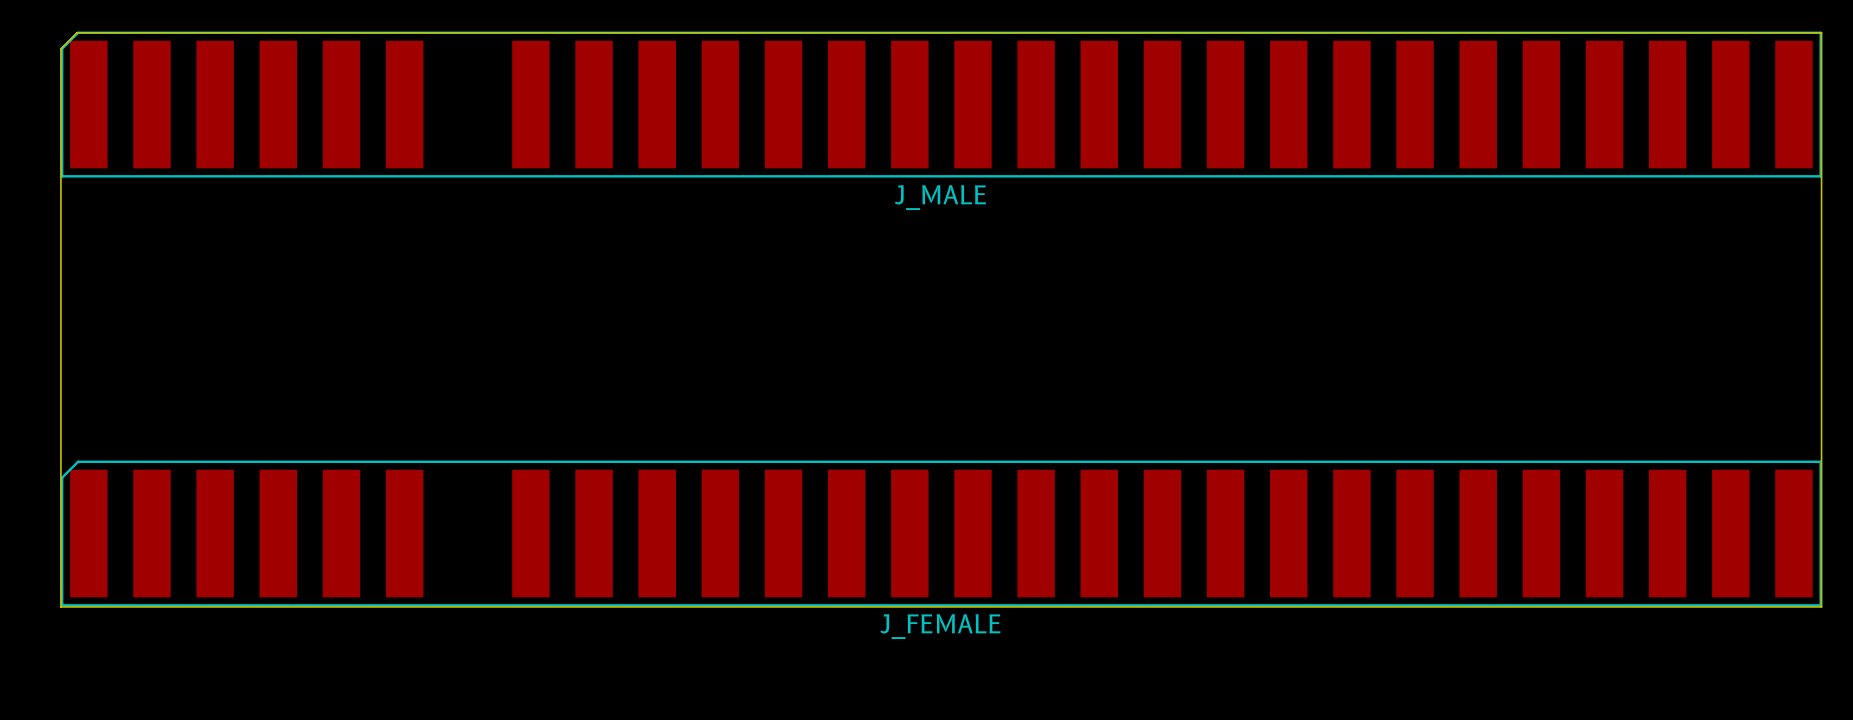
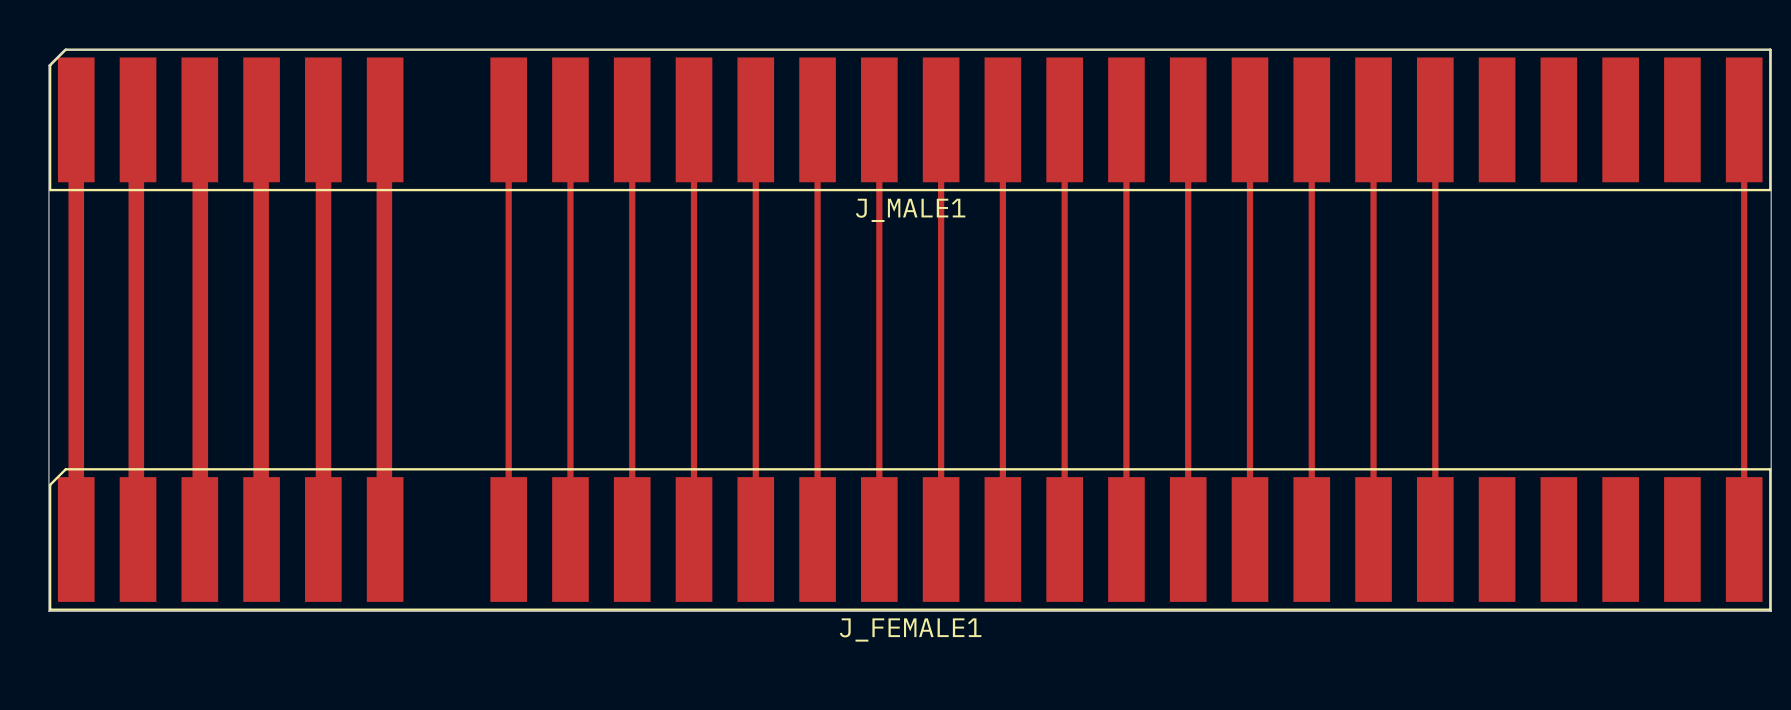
track: none -> (76, 119) (76, 539)
track: none -> (508, 119) (508, 539)
track: none -> (570, 119) (570, 539)
track: none -> (632, 119) (632, 539)
track: none -> (694, 119) (694, 539)
track: none -> (755, 119) (755, 539)
track: none -> (817, 119) (817, 539)
track: none -> (879, 119) (879, 539)
track: none -> (941, 119) (941, 539)
track: none -> (1002, 119) (1002, 539)
track: none -> (1064, 119) (1064, 539)
track: none -> (1126, 119) (1126, 539)
track: none -> (1188, 119) (1188, 539)
track: none -> (1249, 119) (1249, 539)
track: none -> (1311, 119) (1311, 539)
track: none -> (1373, 119) (1373, 539)
track: none -> (1435, 119) (1435, 539)
track: none -> (1744, 119) (1744, 539)
track: none -> (323, 151) (323, 531)
track: none -> (384, 156) (384, 535)
track: none -> (136, 159) (136, 539)
track: none -> (261, 165) (261, 545)
track: none -> (200, 170) (200, 550)
J_MALE name: J_MALE (940, 197) -> J_MALE1 (910, 210)
J_FEMALE name: J_FEMALE (940, 626) -> J_FEMALE1 (910, 629)

